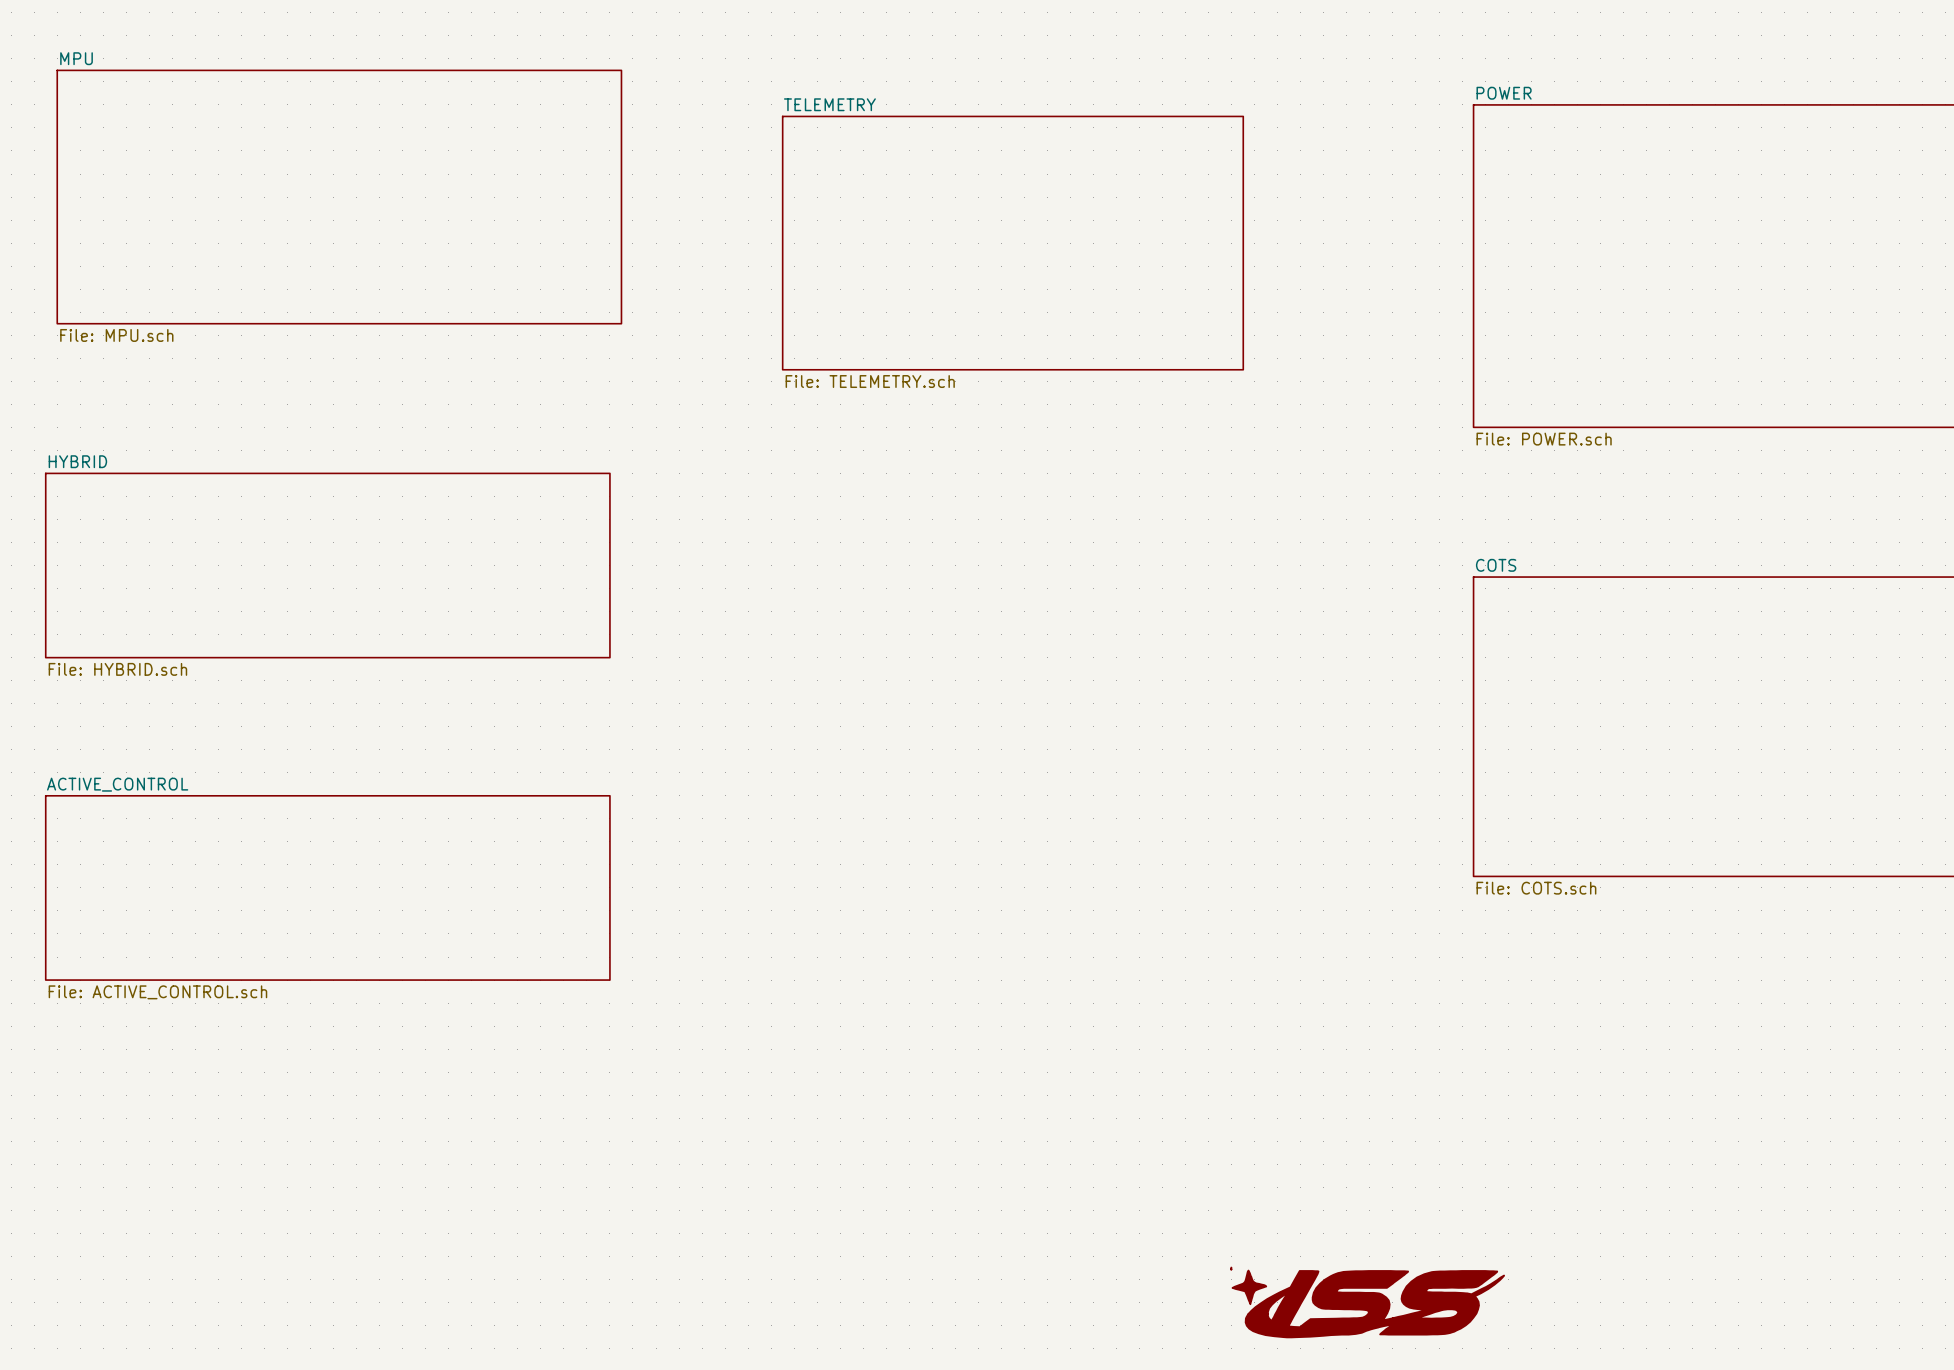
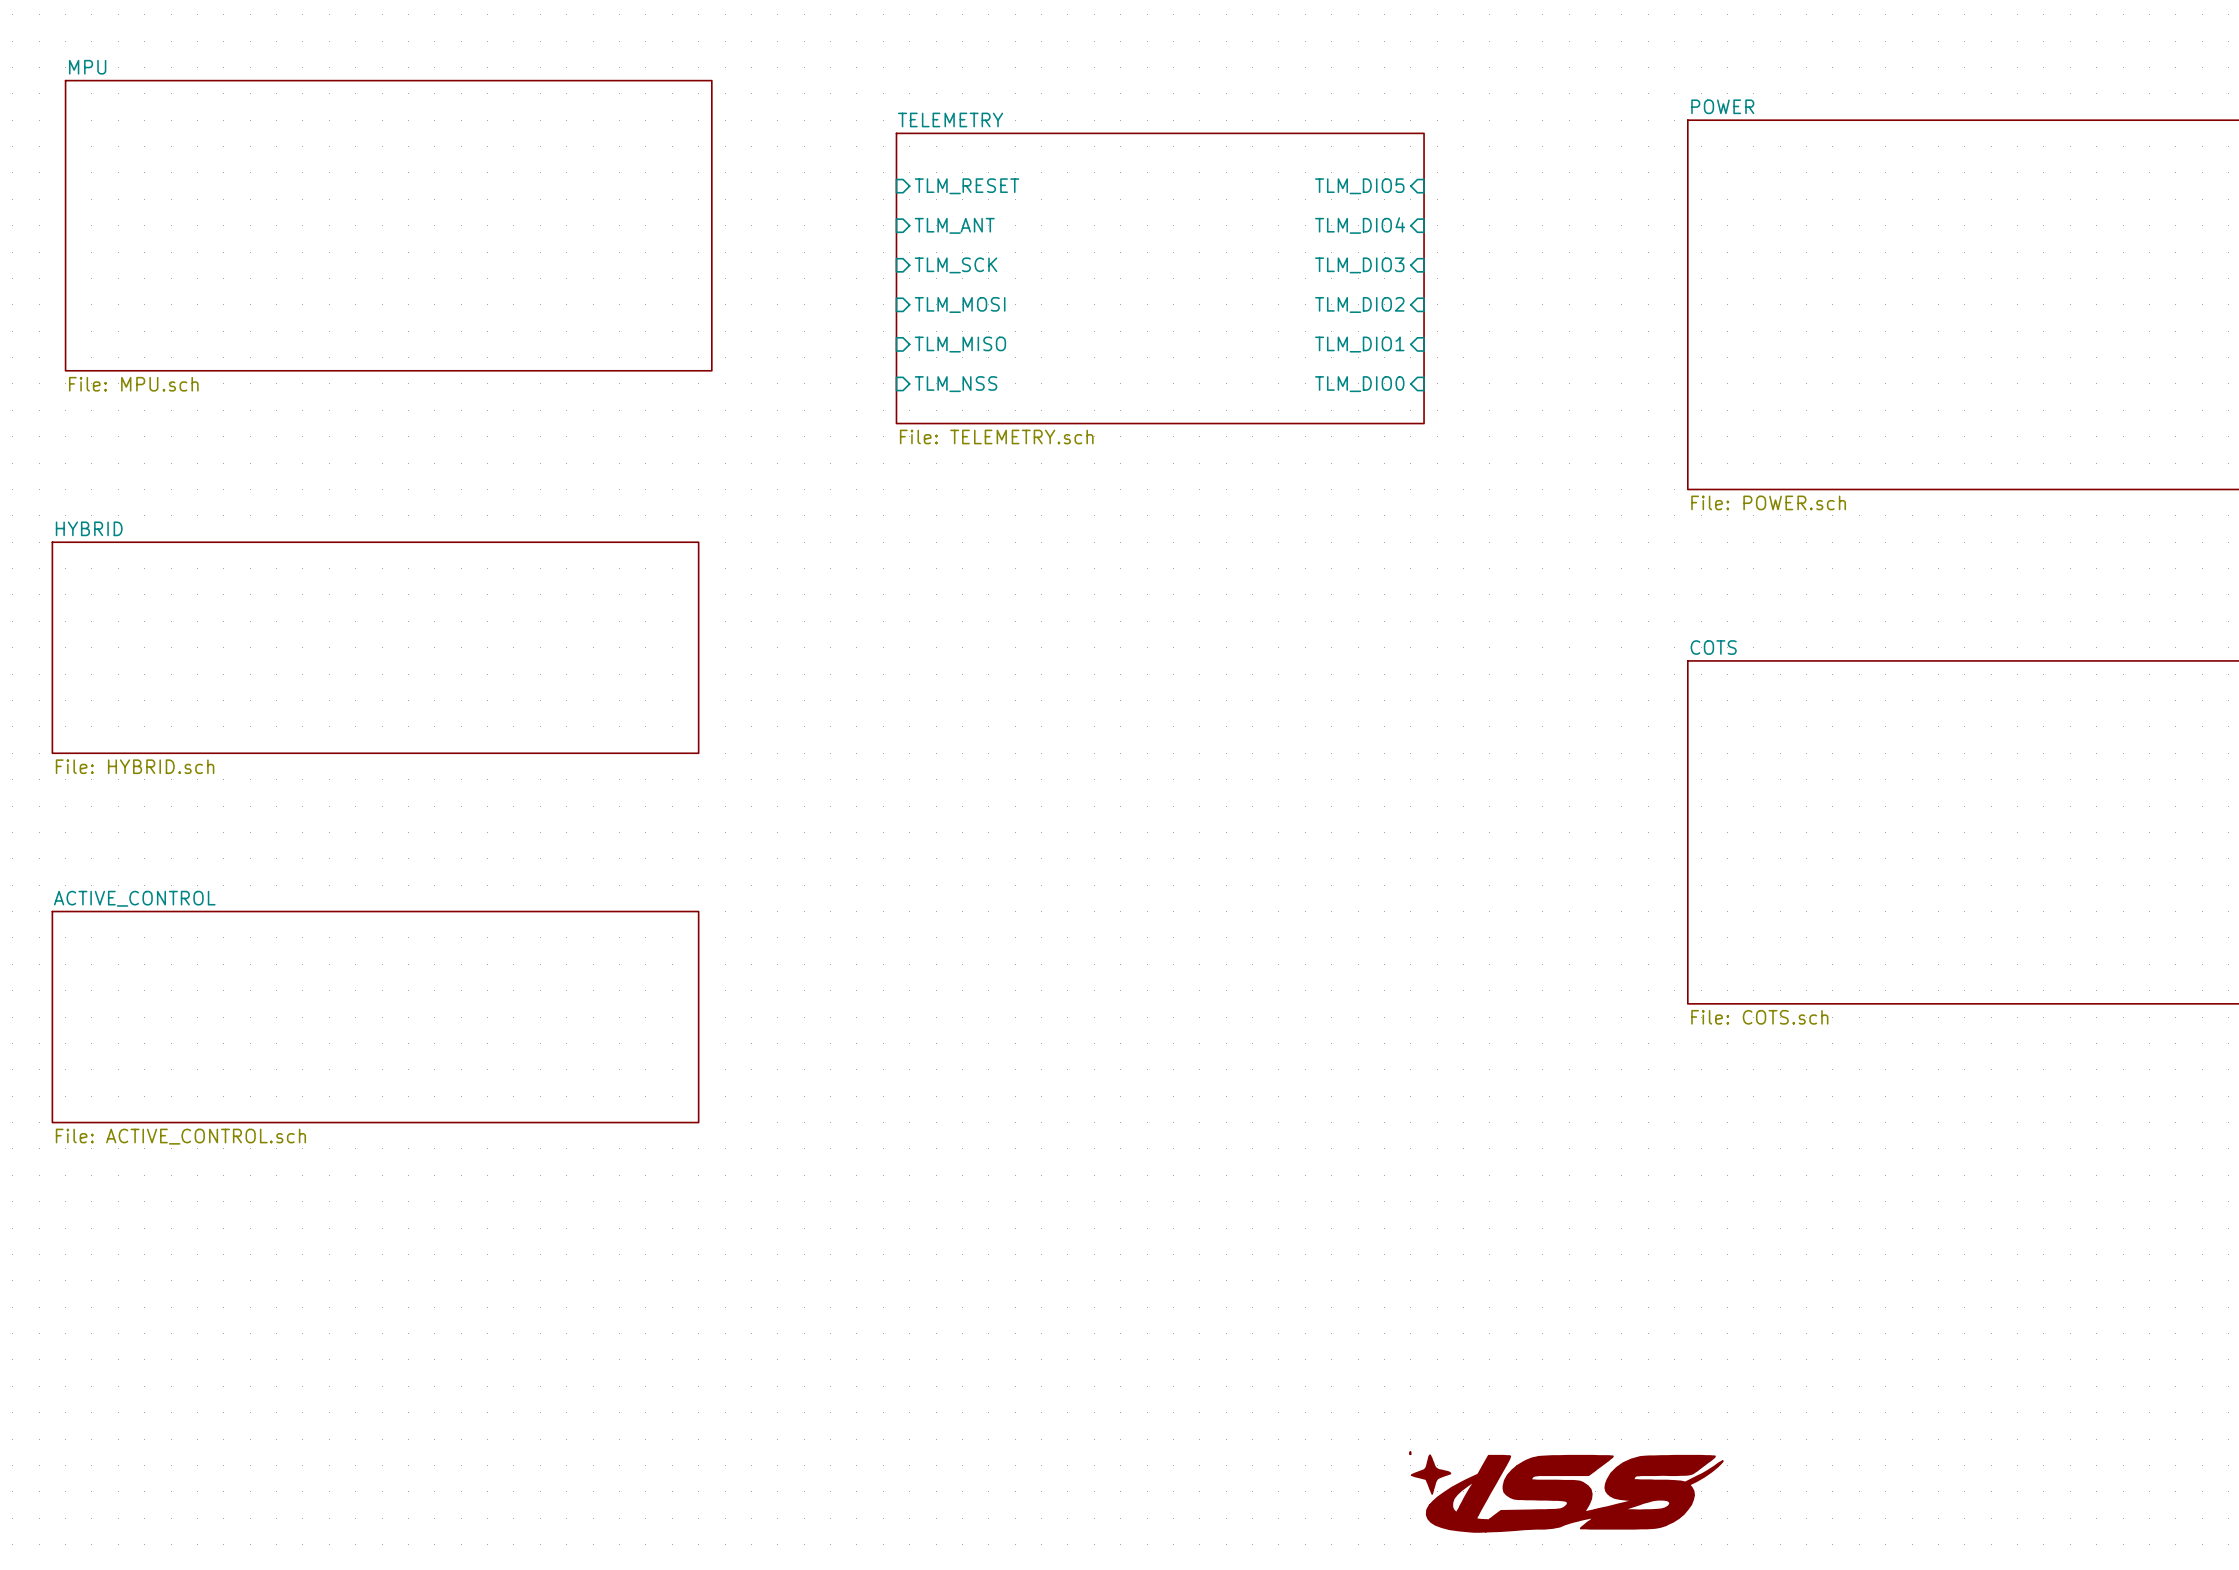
sheet pin: none -> TLM_RESET (967, 186)
sheet pin: none -> TLM_DIO5 (1359, 186)
sheet pin: none -> TLM_DIO4 (1360, 225)
sheet pin: none -> TLM_ANT (954, 225)
sheet pin: none -> TLM_SCK (956, 265)
sheet pin: none -> TLM_DIO3 (1359, 265)
sheet pin: none -> TLM_MOSI (960, 304)
sheet pin: none -> TLM_DIO2 (1359, 304)
sheet pin: none -> TLM_MISO (960, 344)
sheet pin: none -> TLM_DIO1 (1359, 344)
sheet pin: none -> TLM_NSS (956, 384)
sheet pin: none -> TLM_DIO0 (1359, 384)

